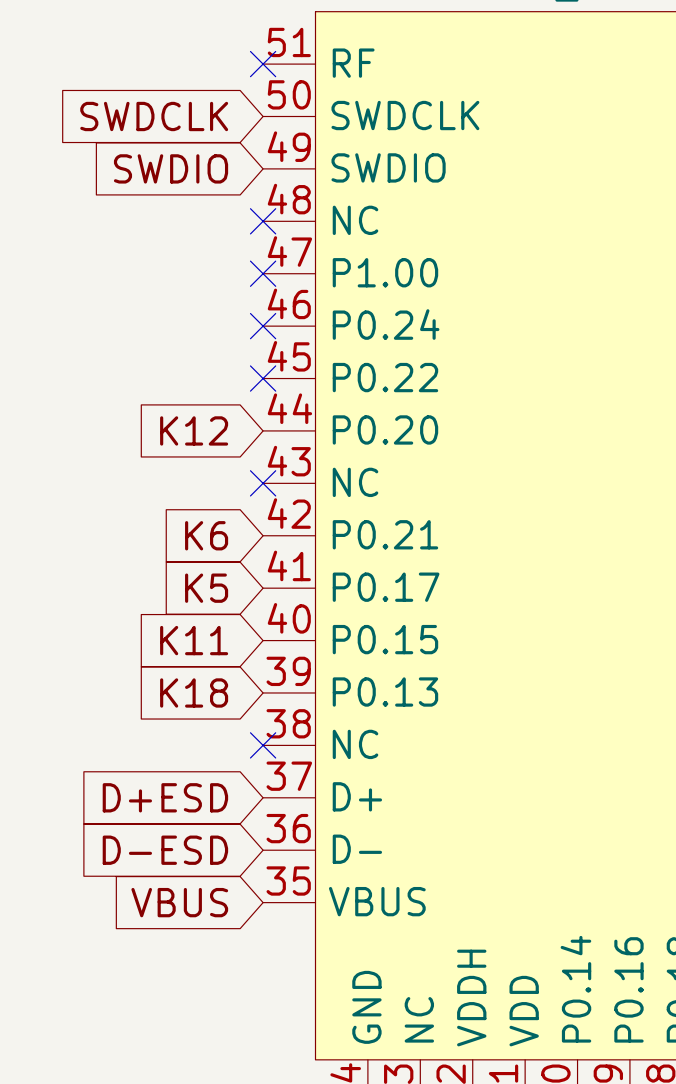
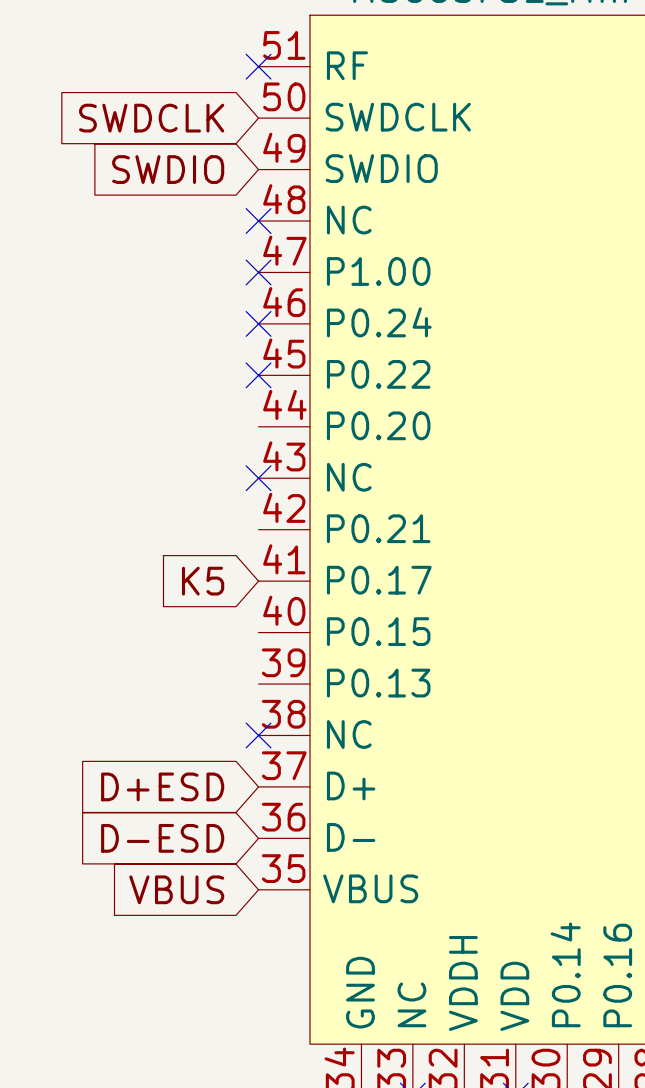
global label: K12 (194, 430) -> none
global label: K6 (206, 535) -> none
global label: K11 (194, 640) -> none
global label: K18 (194, 692) -> none

